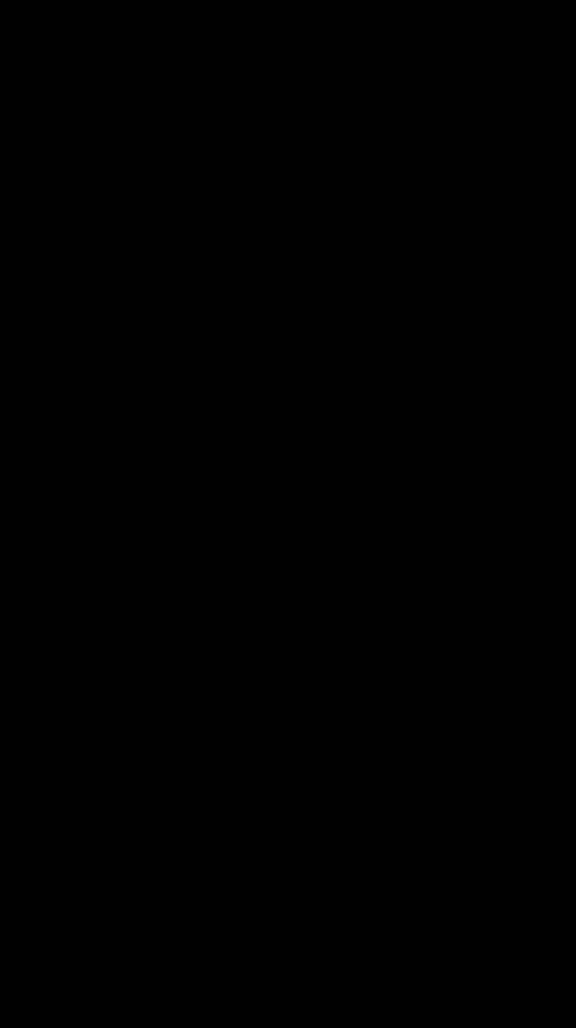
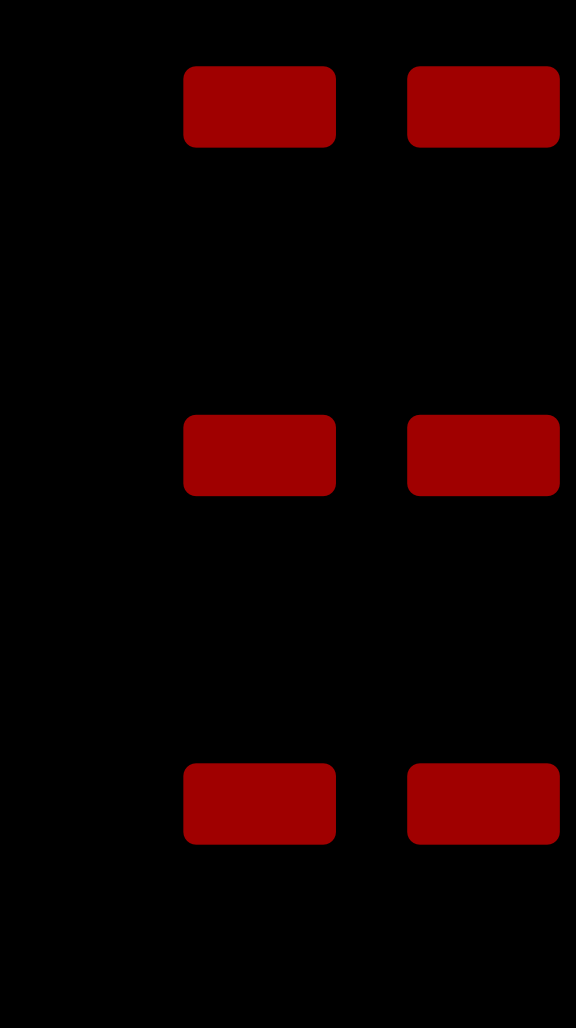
part: none -> (371, 106)
part: none -> (371, 455)
part: none -> (371, 803)

